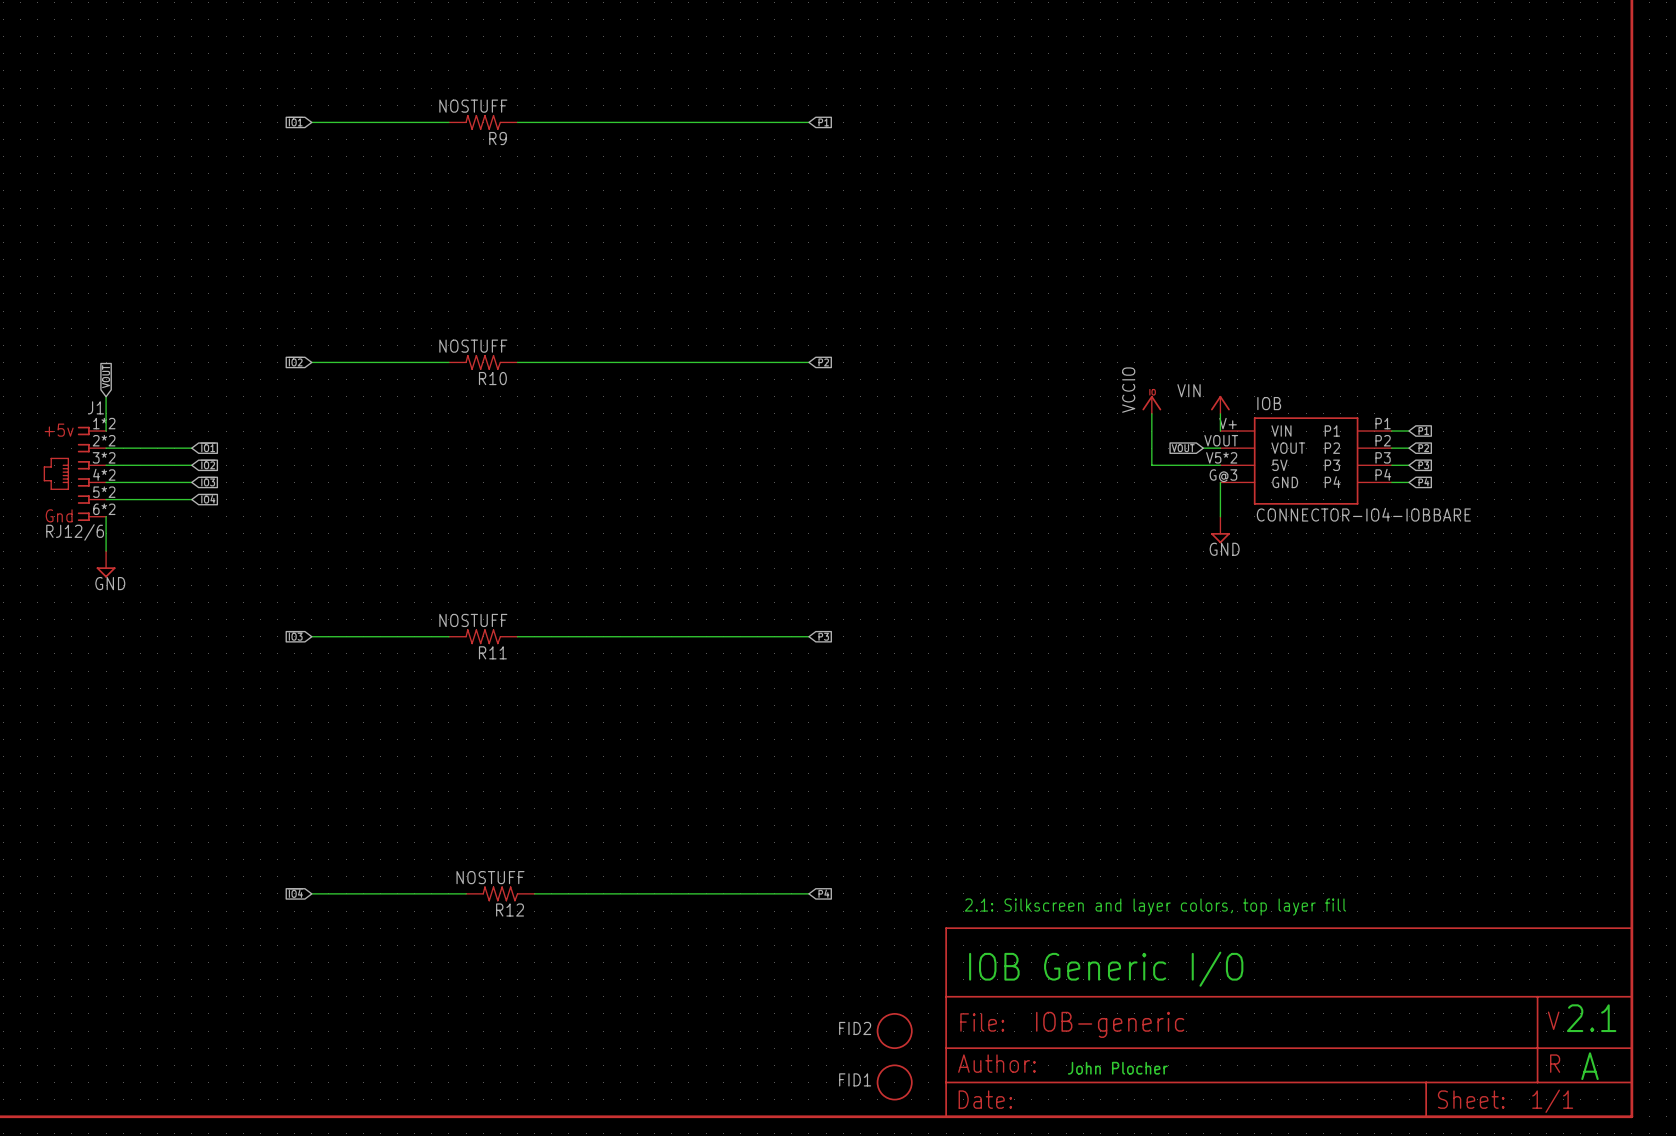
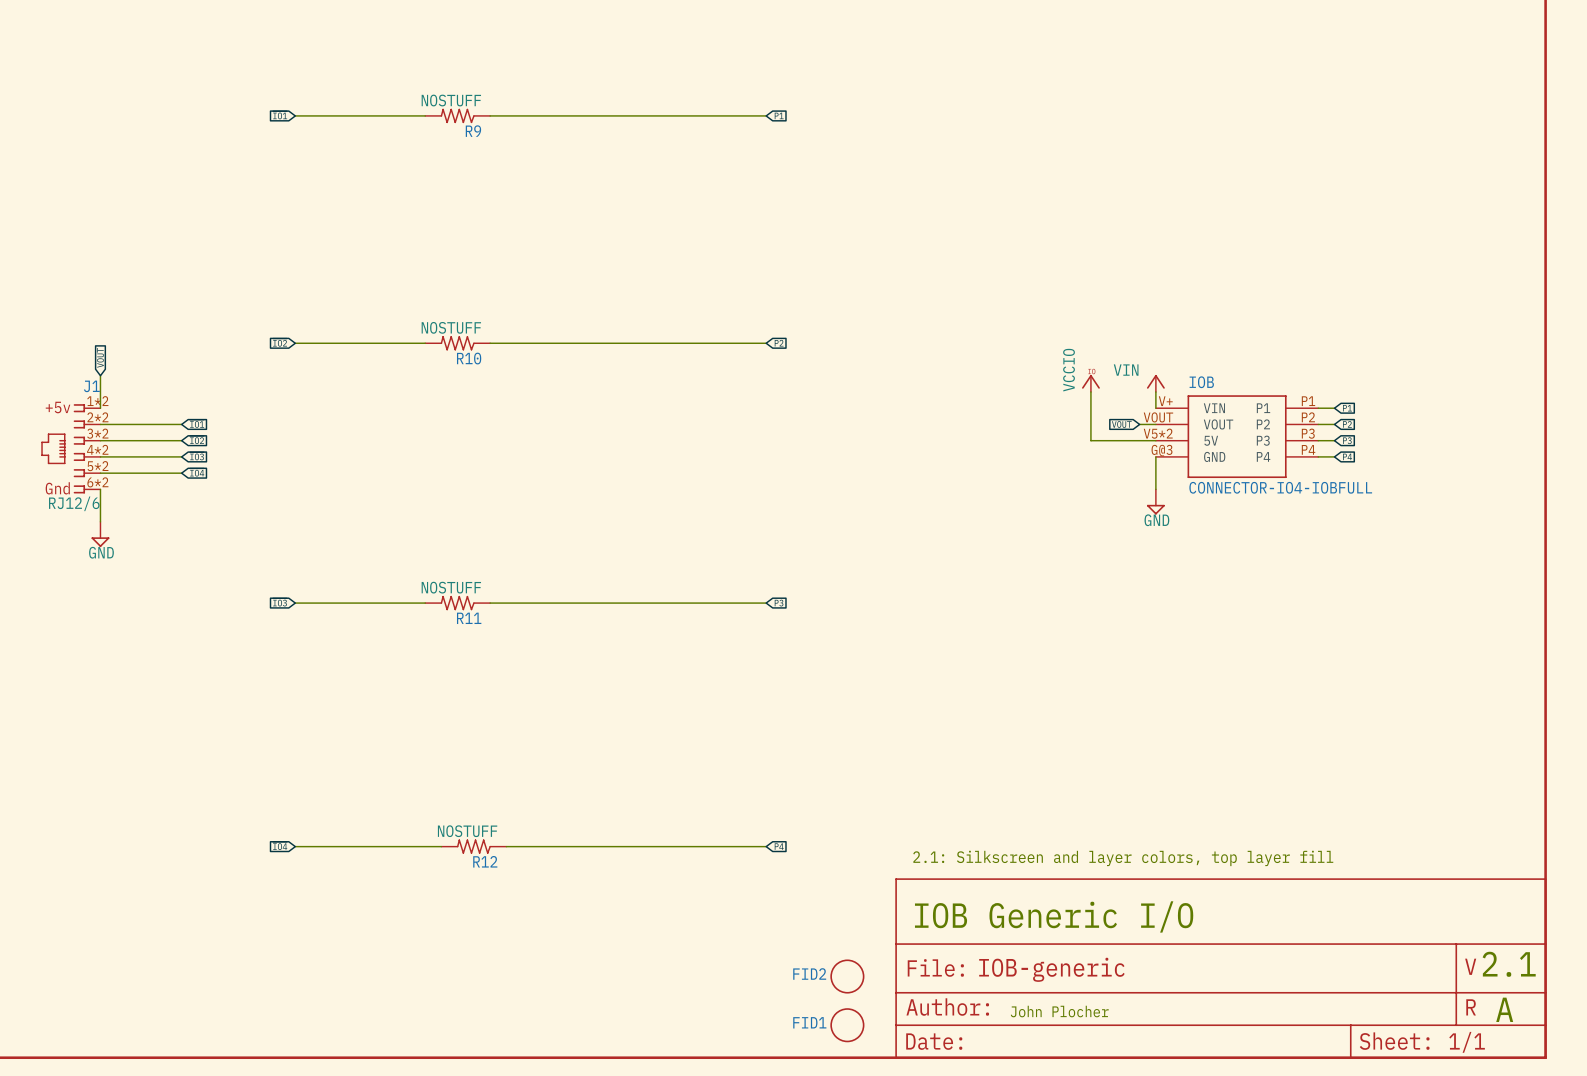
IOB value: CONNECTOR-IO4-IOBBARE (1363, 514) -> CONNECTOR-IO4-IOBFULL (1280, 487)

